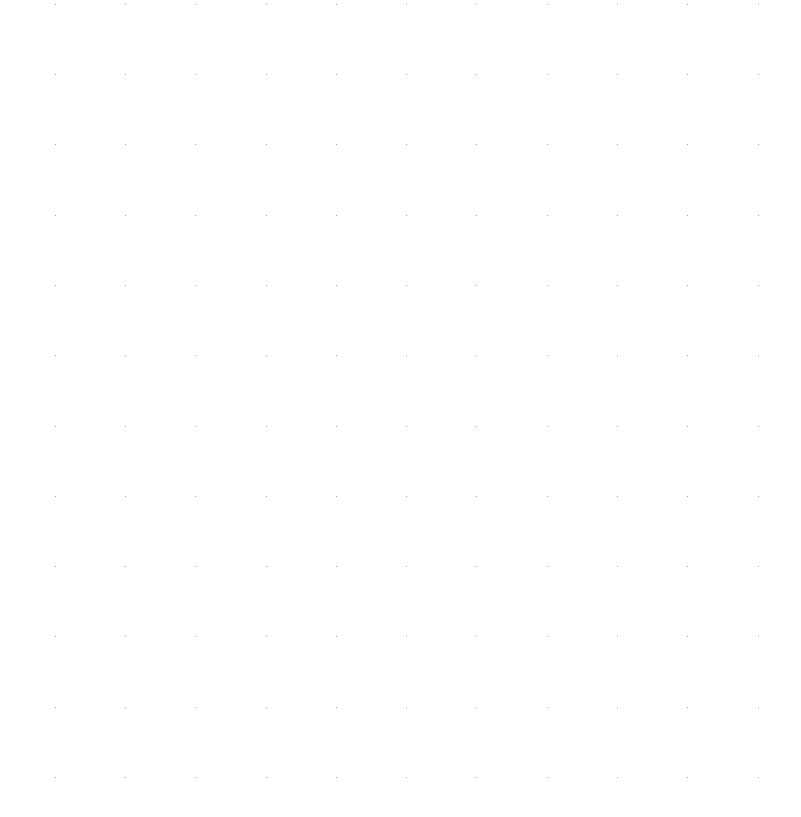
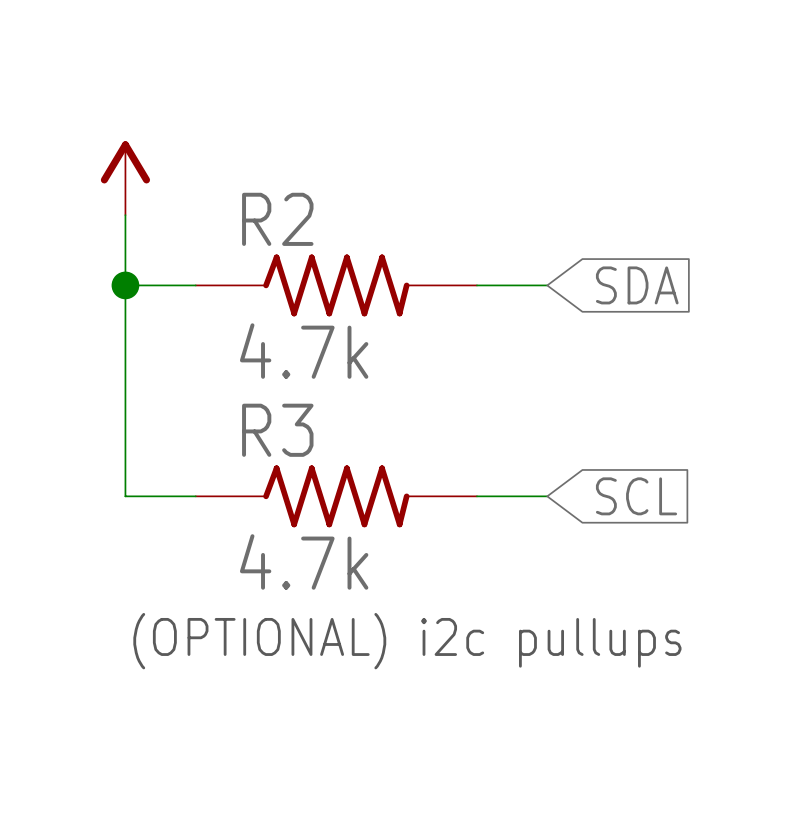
power symbol: none -> (125, 178)
wire: none -> (125, 215) (125, 496) (195, 496)
wire: none -> (125, 285) (195, 285)
junction: none -> (125, 285)
R2: none -> 4.7k (336, 285)
wire: none -> (476, 285) (547, 285)
global label: none -> SDA (637, 285)
R3: none -> 4.7k (336, 496)
wire: none -> (476, 496) (547, 496)
global label: none -> SCL (636, 496)
text: none -> (OPTIONAL) i2c pullups (407, 641)

